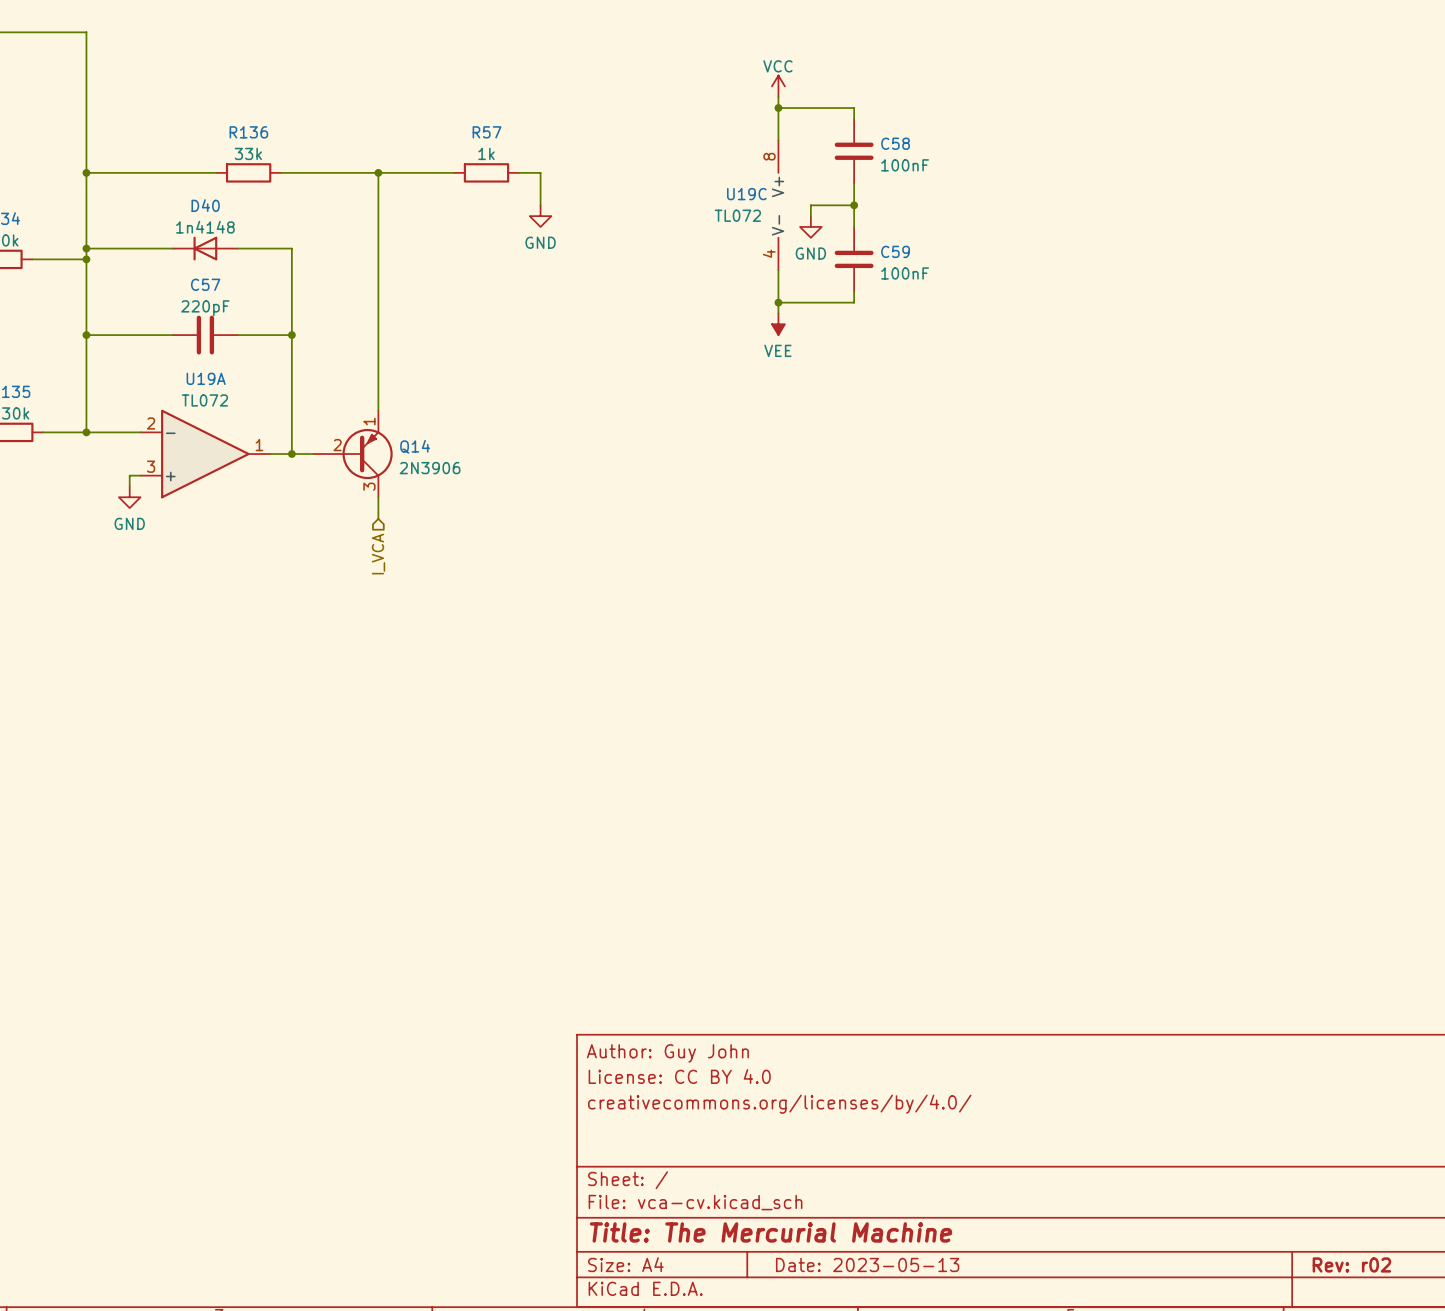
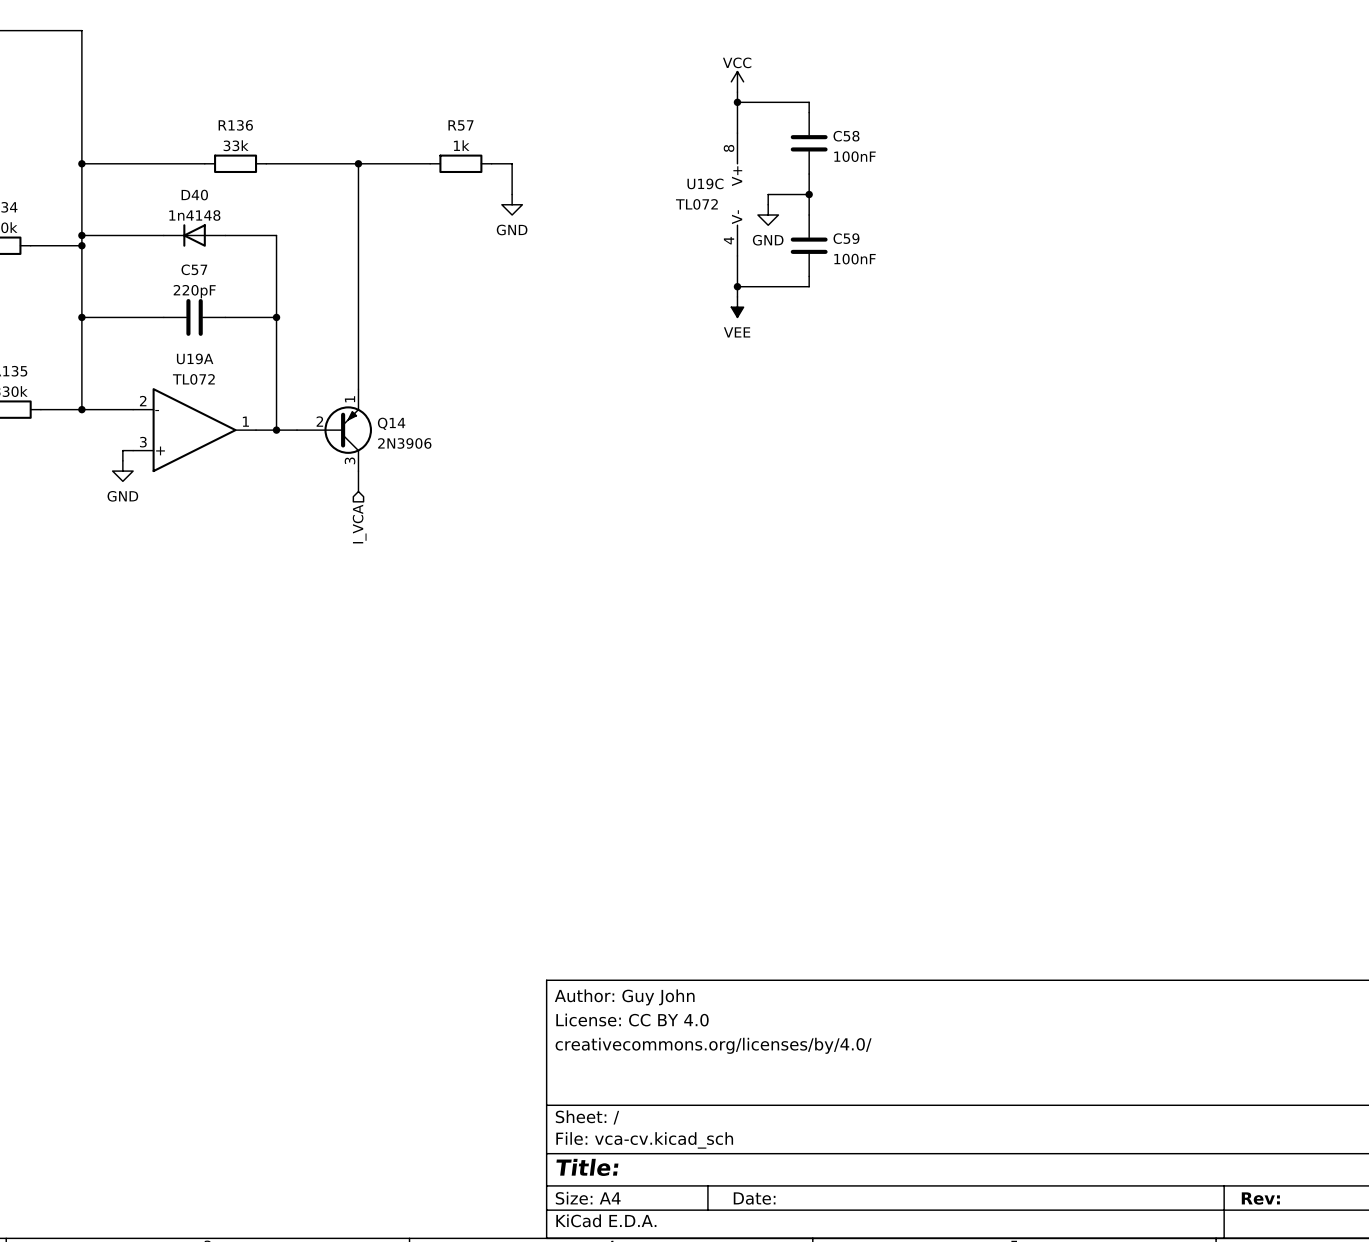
title block: Title: The Mercurial Machine (771, 1232) -> Title: (587, 1167)
title block: Date: 2023-05-13 (867, 1264) -> Date: (754, 1198)
title block: Rev: r02 (1351, 1264) -> Rev: (1260, 1198)

